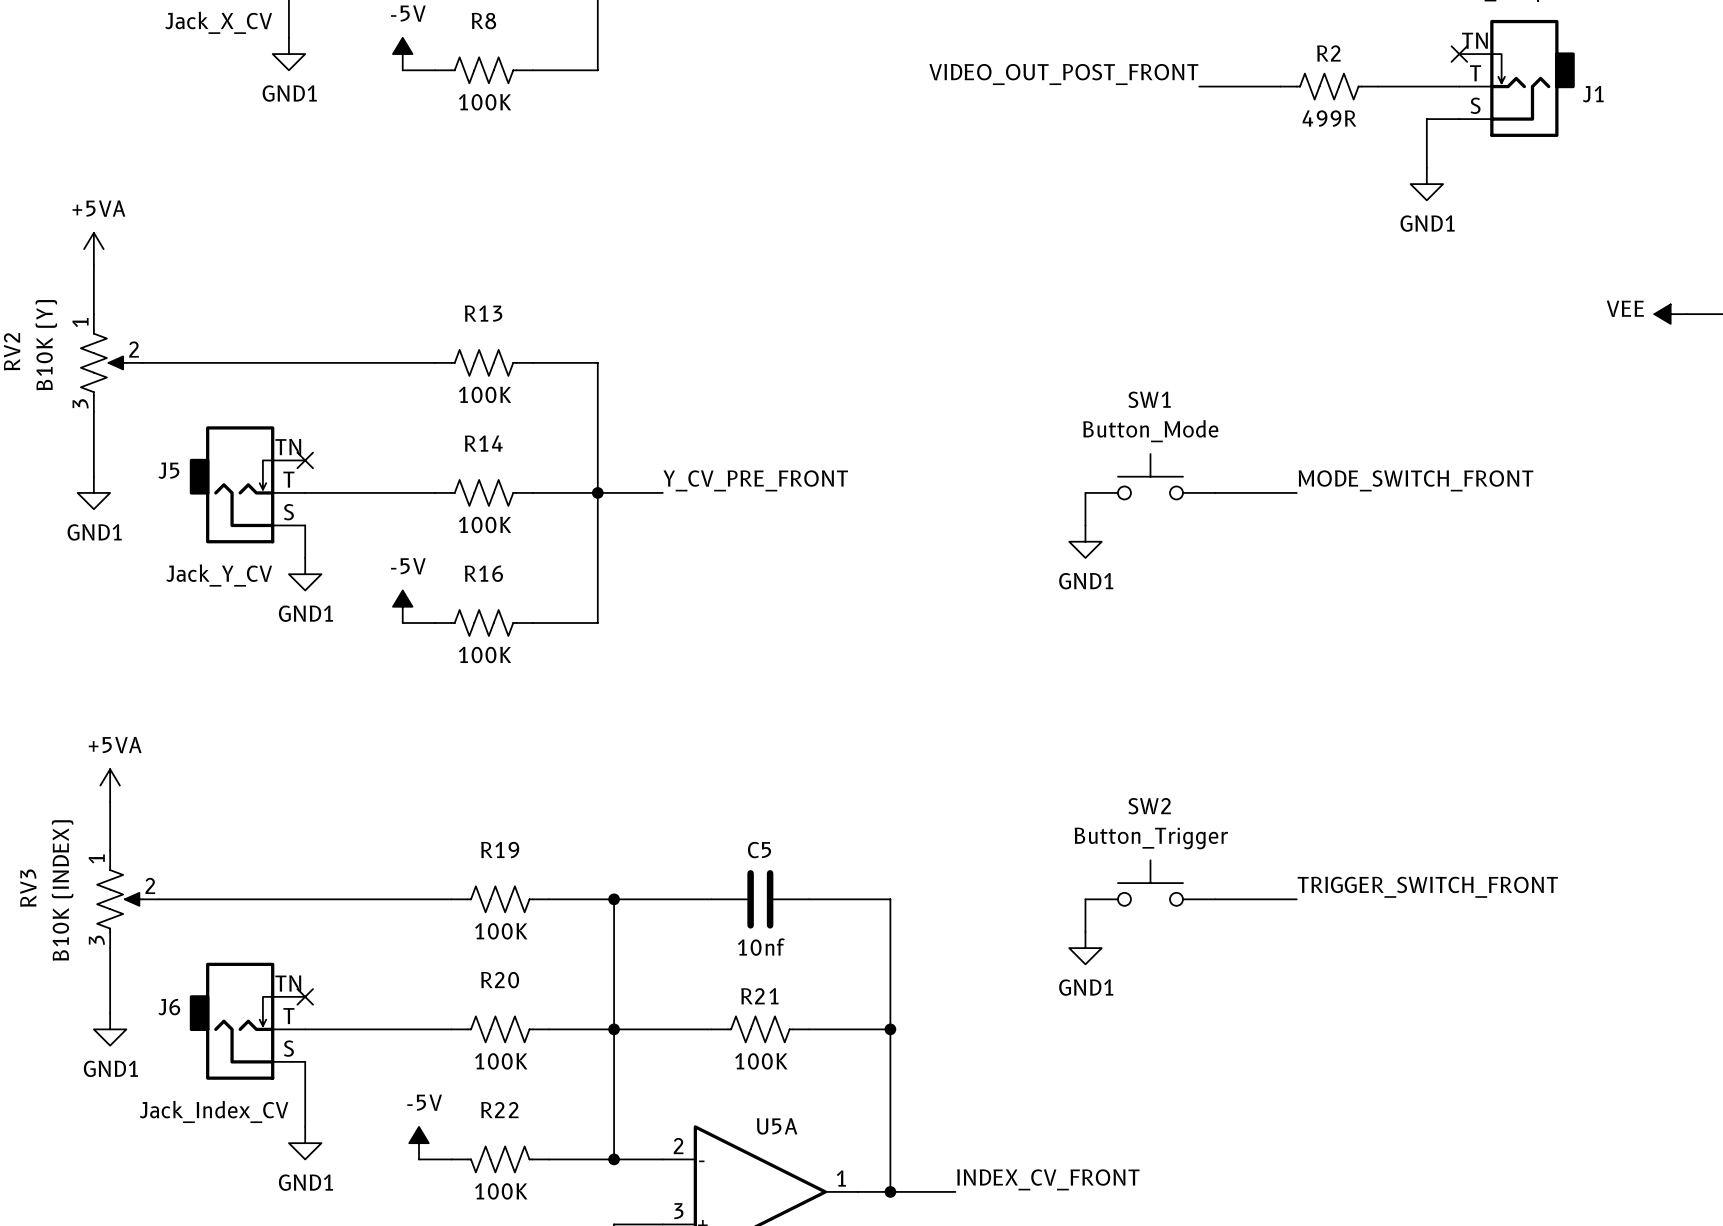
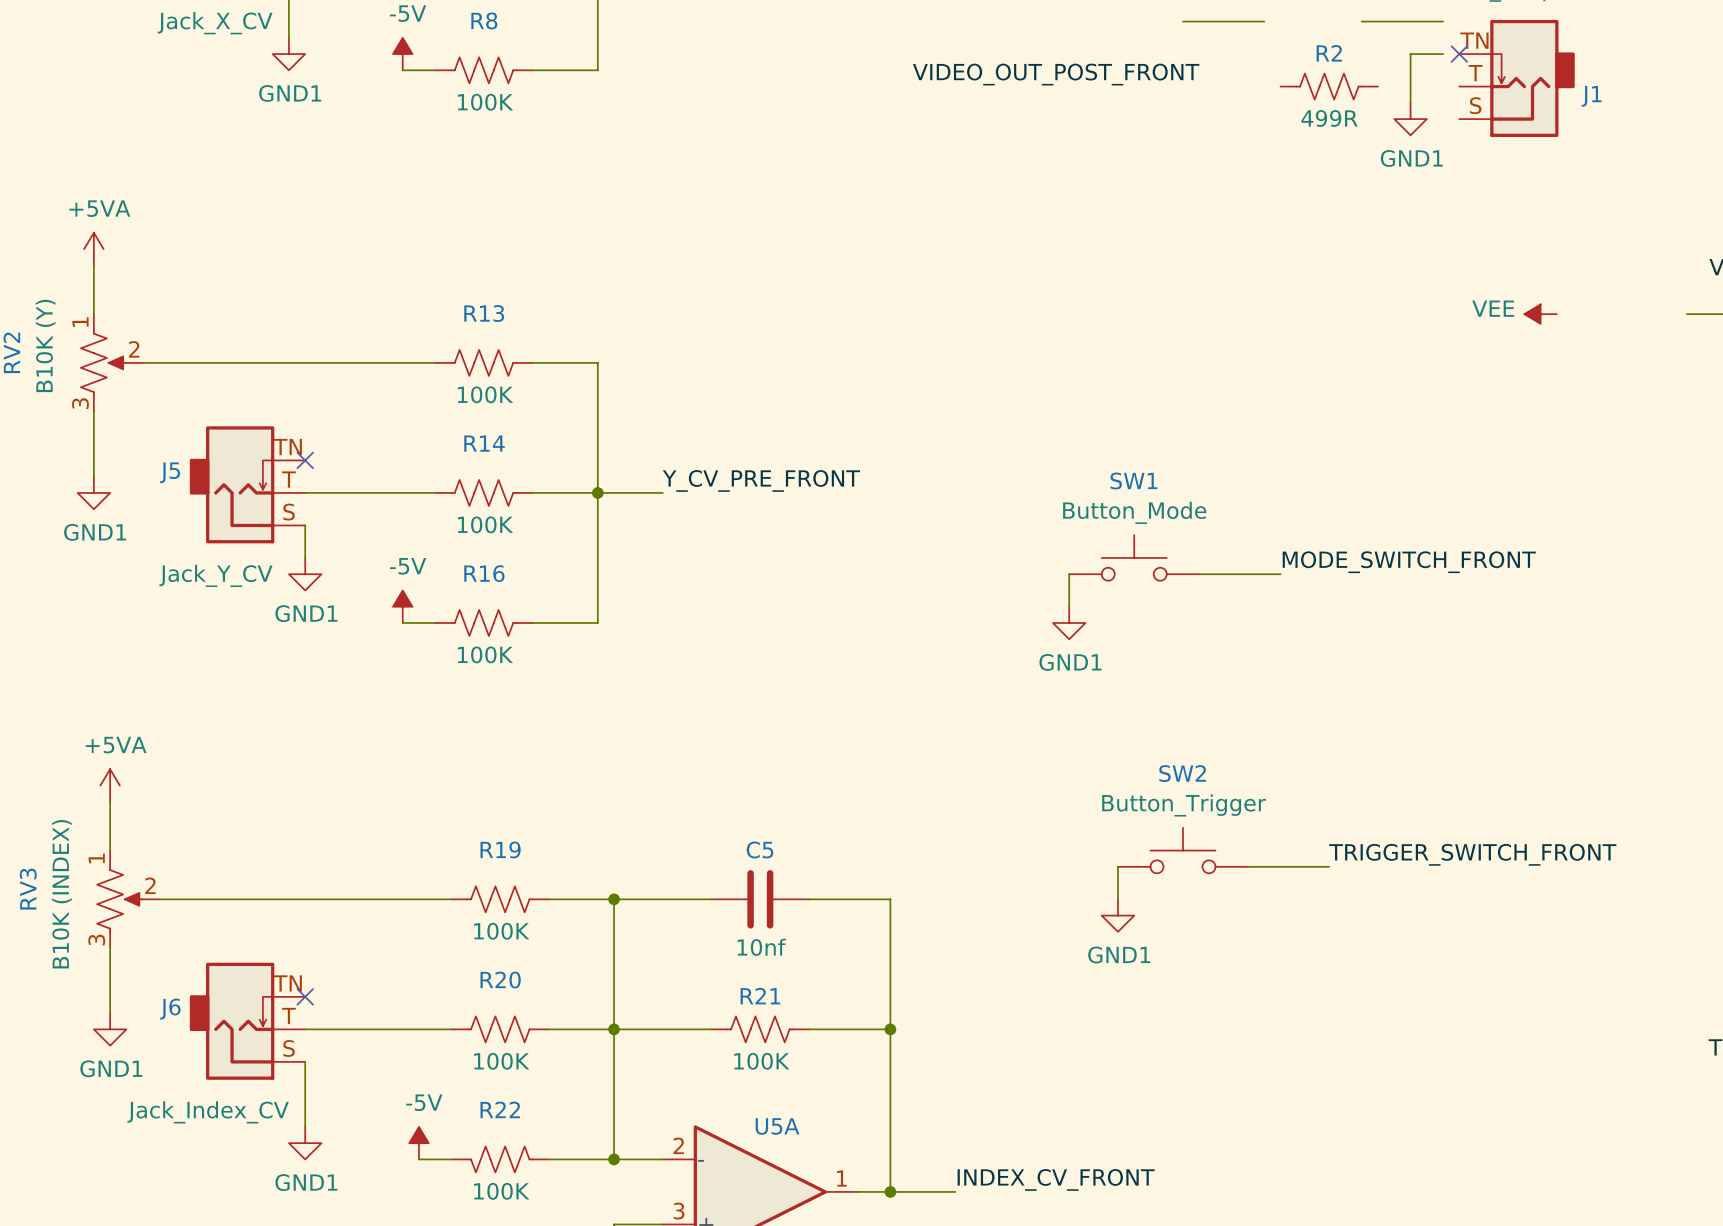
wire: (1199, 86) (1280, 86) -> (1183, 21) (1264, 21)
wire: (1378, 86) (1459, 86) -> (1361, 21) (1443, 21)
wire: (1459, 119) (1426, 119) (1426, 167) -> (1443, 54) (1410, 54) (1410, 102)
power symbol position: GND1 (1426, 184) -> GND1 (1410, 119)
power symbol position: VEE (1670, 314) -> VEE (1540, 314)
SW1 position: (1150, 476) -> (1134, 557)
label position: MODE_SWITCH_FRONT (1415, 480) -> MODE_SWITCH_FRONT (1409, 562)
wire: (1085, 492) (1085, 525) -> (1069, 574) (1069, 606)
wire: (1215, 492) (1296, 492) -> (1199, 574) (1280, 574)
power symbol position: GND1 (1085, 541) -> GND1 (1069, 623)
SW2 position: (1150, 883) -> (1183, 850)
label position: TRIGGER_SWITCH_FRONT (1427, 887) -> TRIGGER_SWITCH_FRONT (1472, 854)
wire: (1085, 899) (1085, 931) -> (1117, 866) (1117, 899)
wire: (1215, 899) (1296, 899) -> (1248, 866) (1329, 866)
power symbol position: GND1 (1085, 948) -> GND1 (1117, 915)

